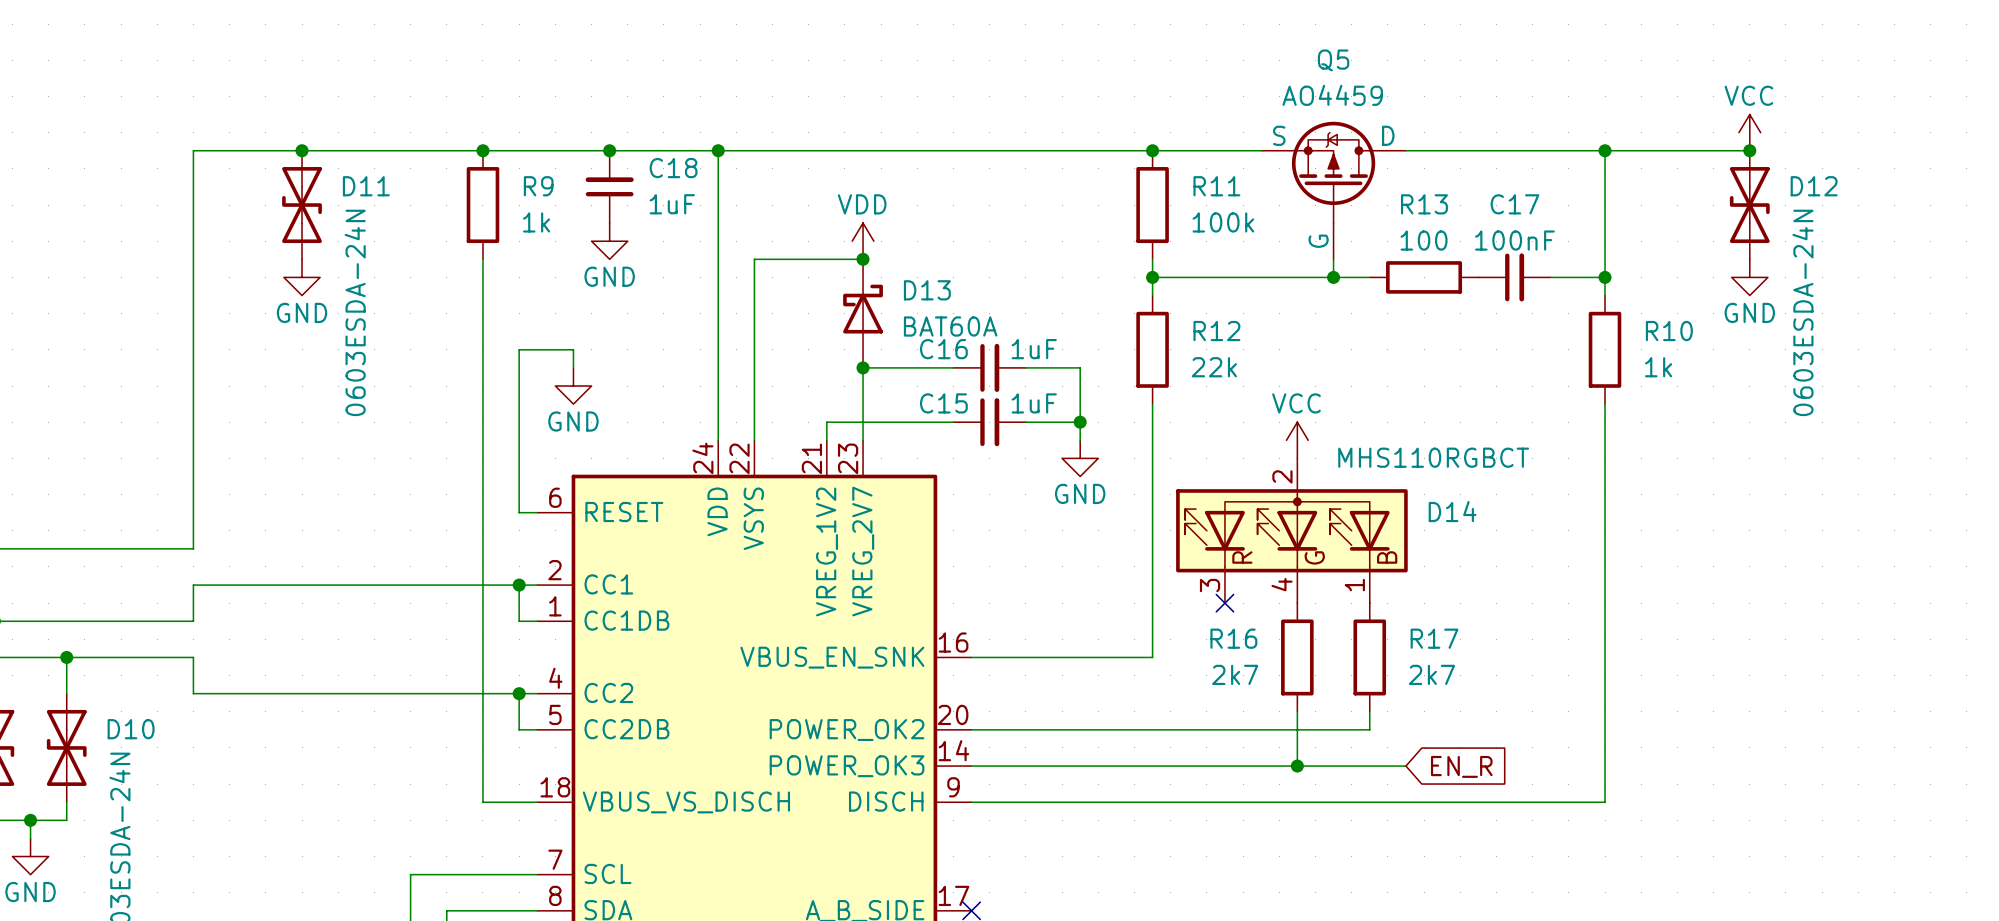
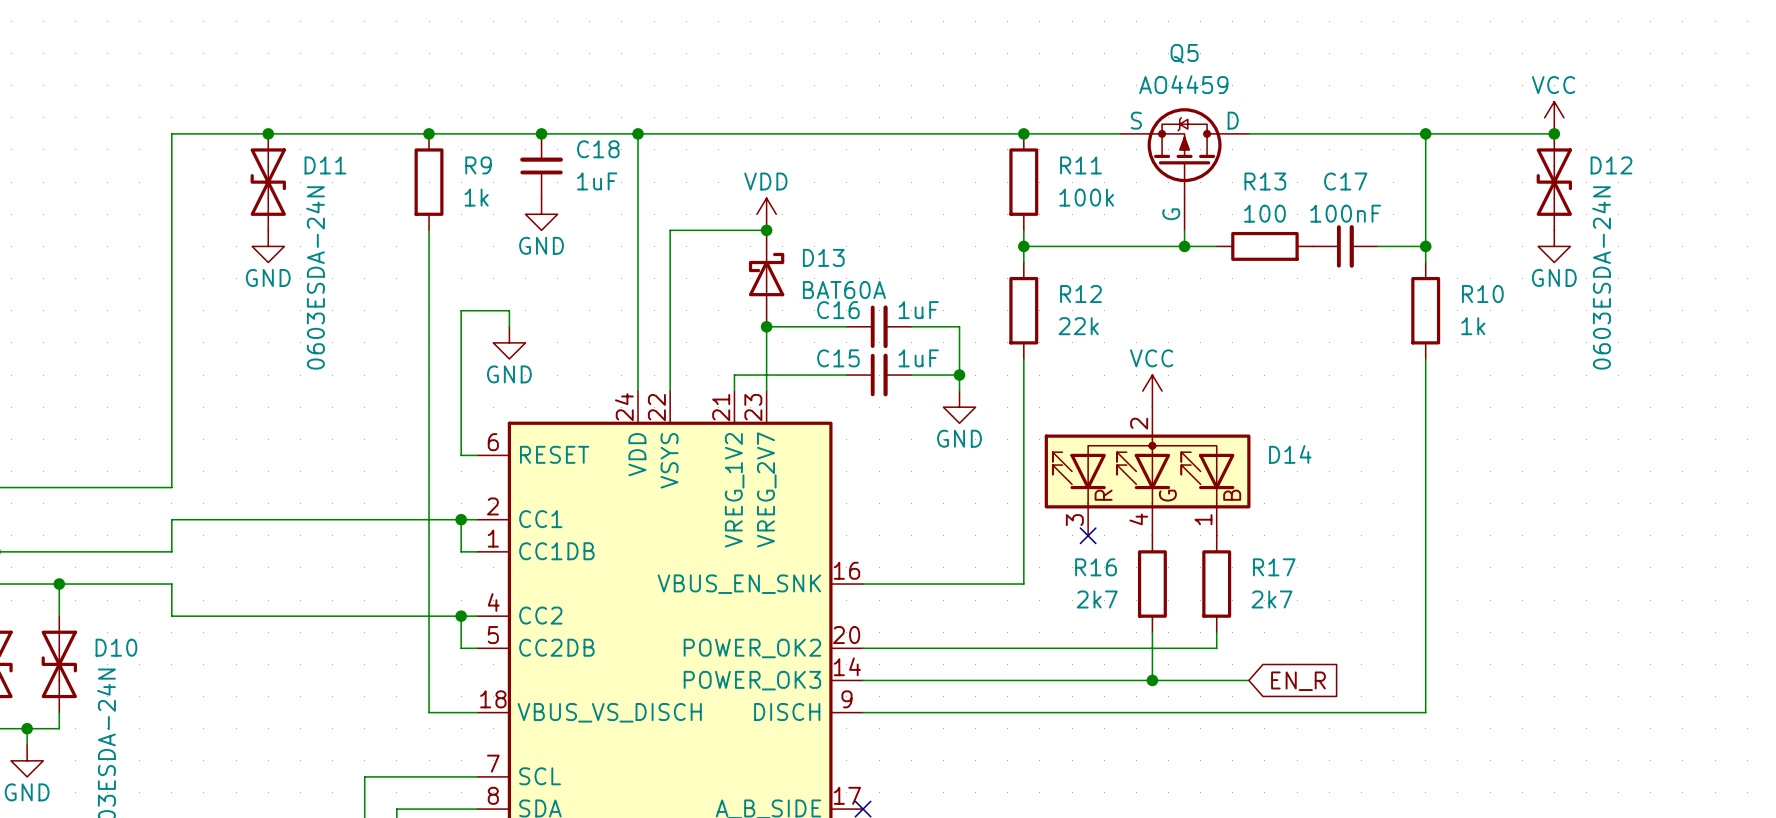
D14 value: MHS110RGBCT (1433, 457) -> none

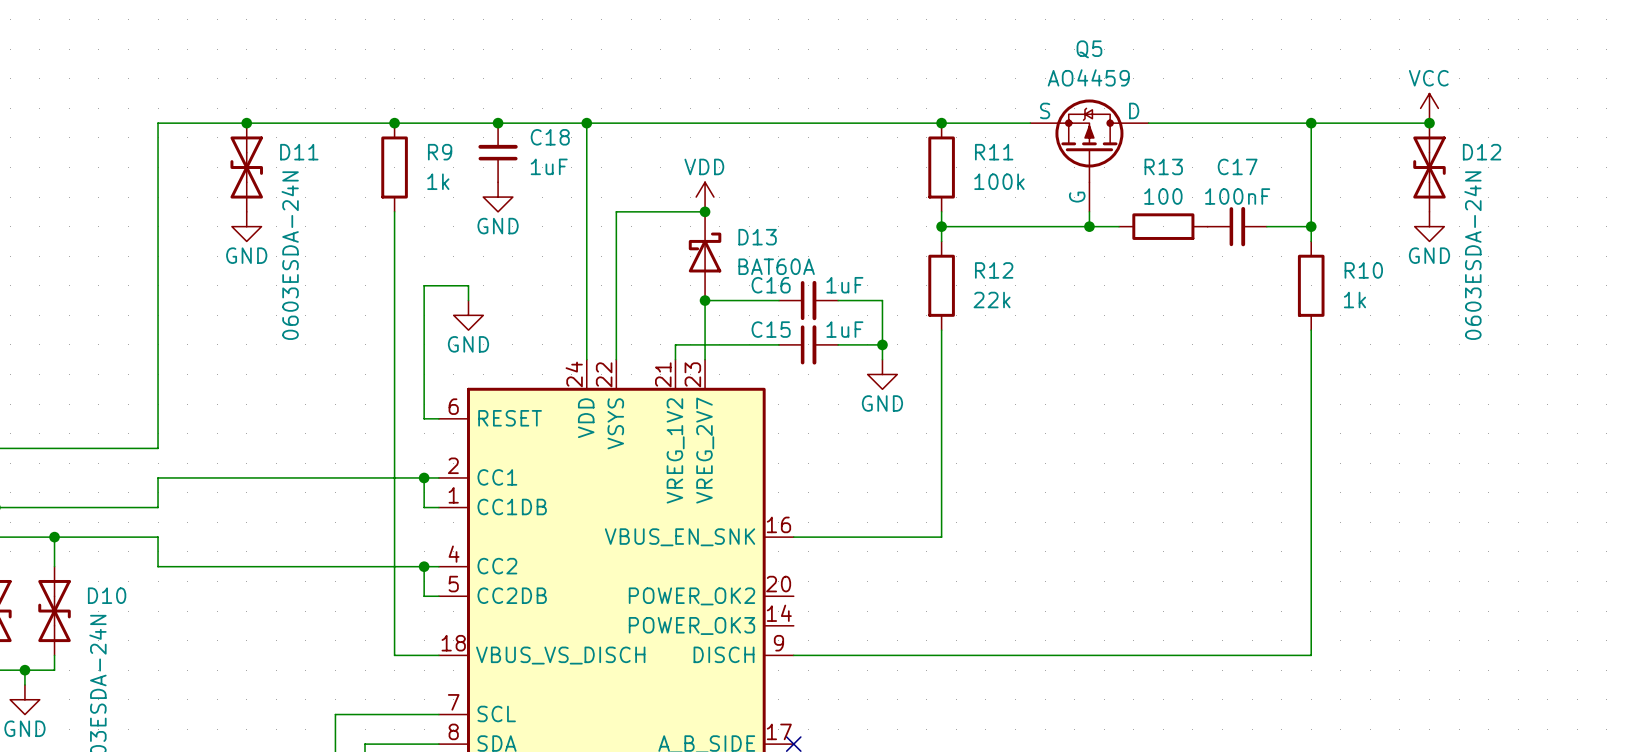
power symbol: VCC (1152, 391) -> none
D14: (1147, 471) -> none
no-connect mark: (1088, 535) -> none
R16: 2k7 (1152, 584) -> none
R17: 2k7 (1216, 584) -> none
wire: (1152, 632) (1152, 680) -> none
wire: (1216, 632) (1216, 648) (863, 648) -> none
wire: (863, 680) (1248, 680) -> none
junction: (1152, 680) -> none
global label: EN_R (1298, 681) -> none

